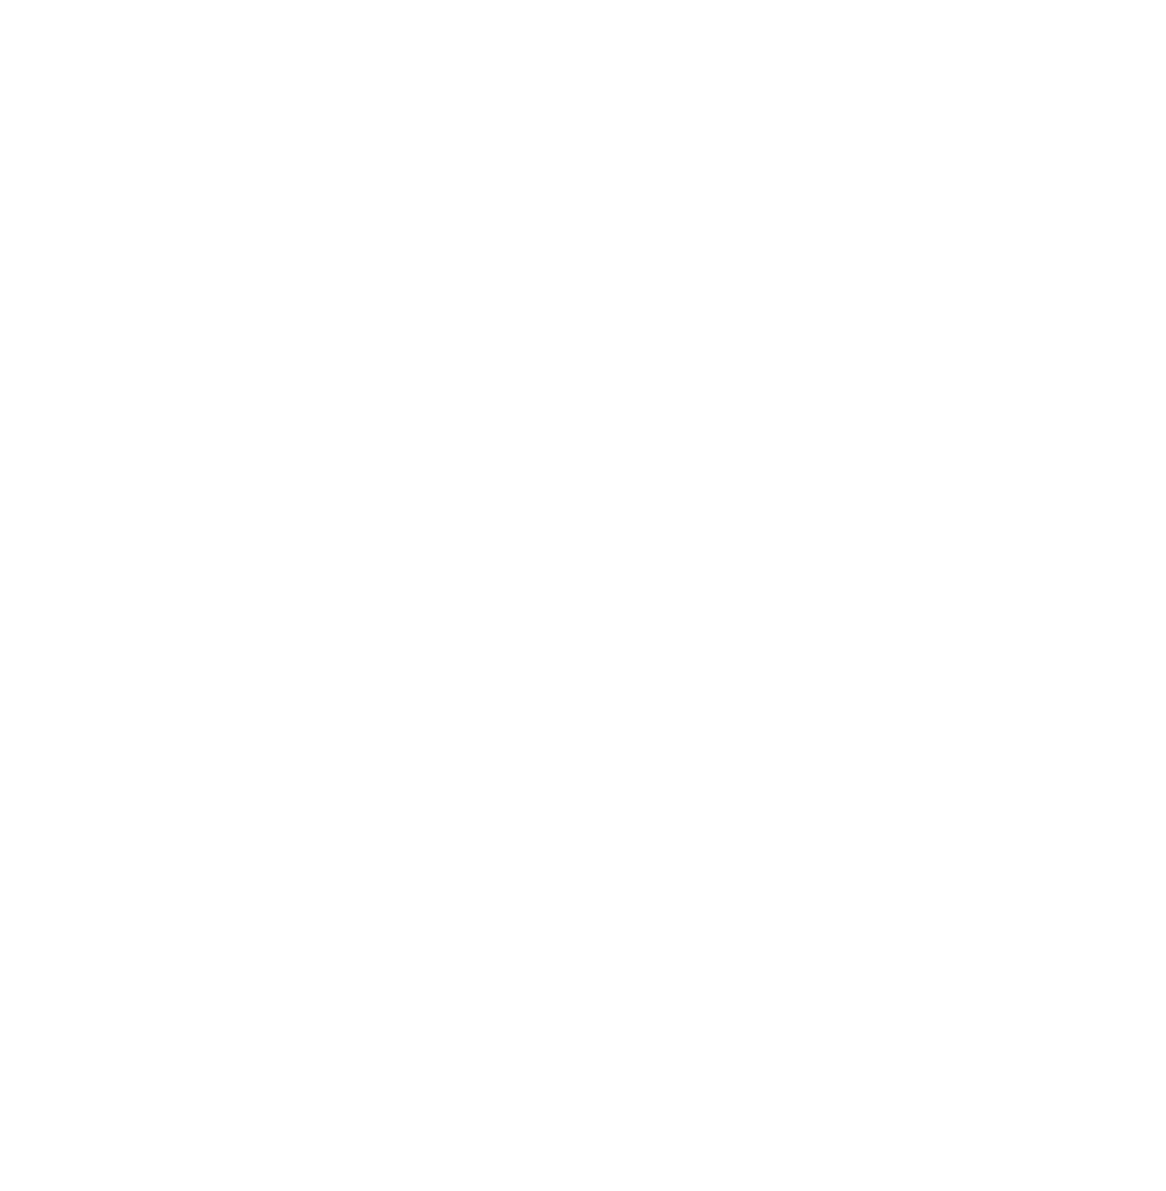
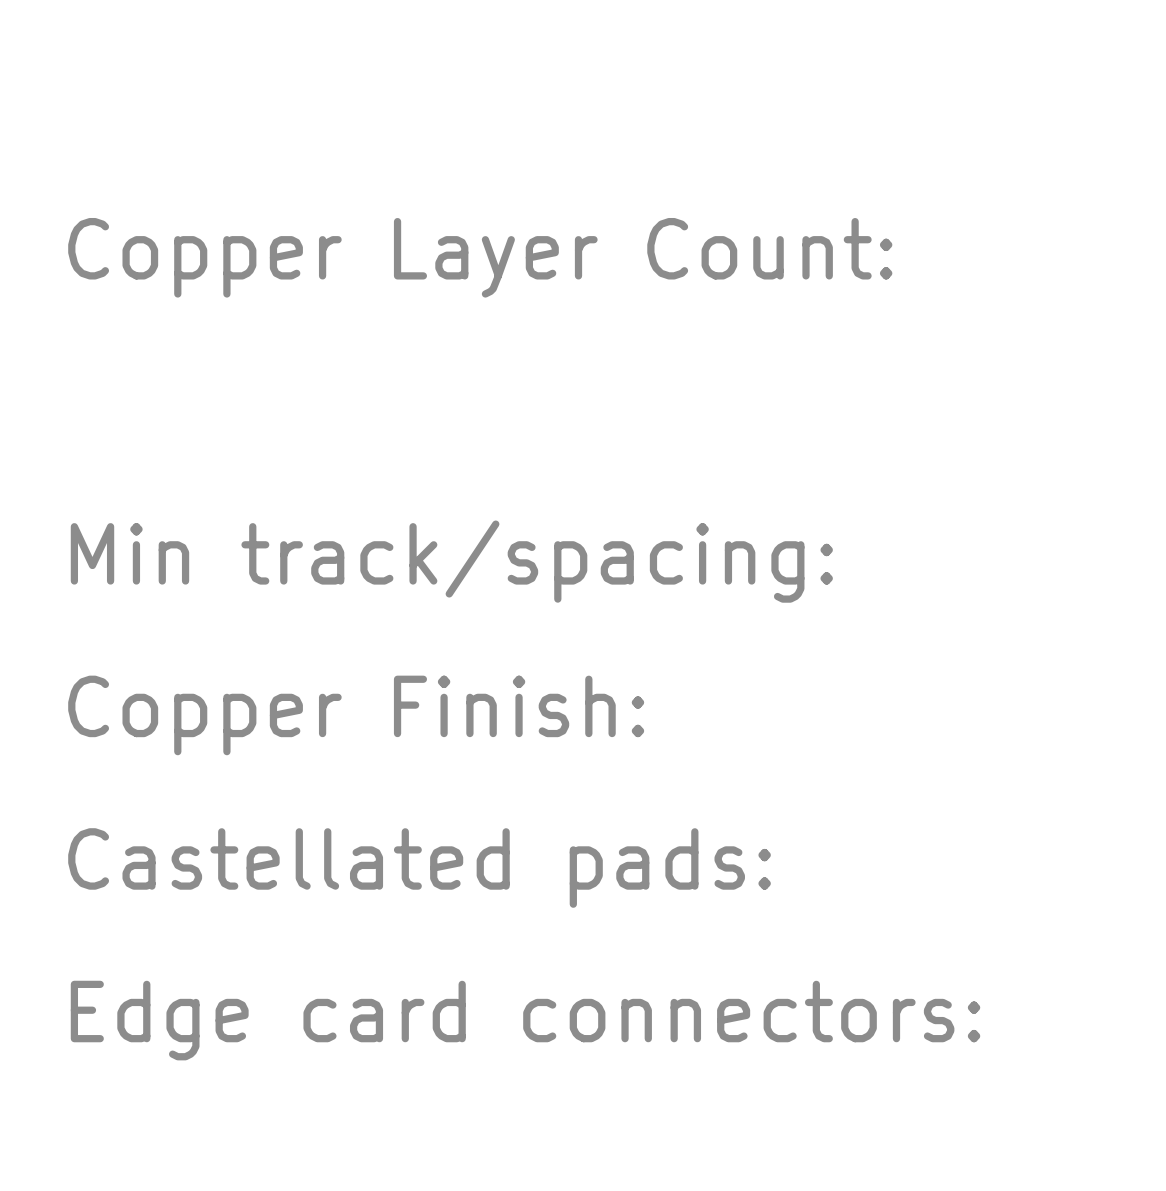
text: none -> Copper Layer Count: (480, 257)
text: none -> Min track/spacing: (451, 561)
text: none -> Copper Finish: (356, 715)
text: none -> Castellated pads: (419, 868)
text: none -> Edge card connectors: (525, 1020)

